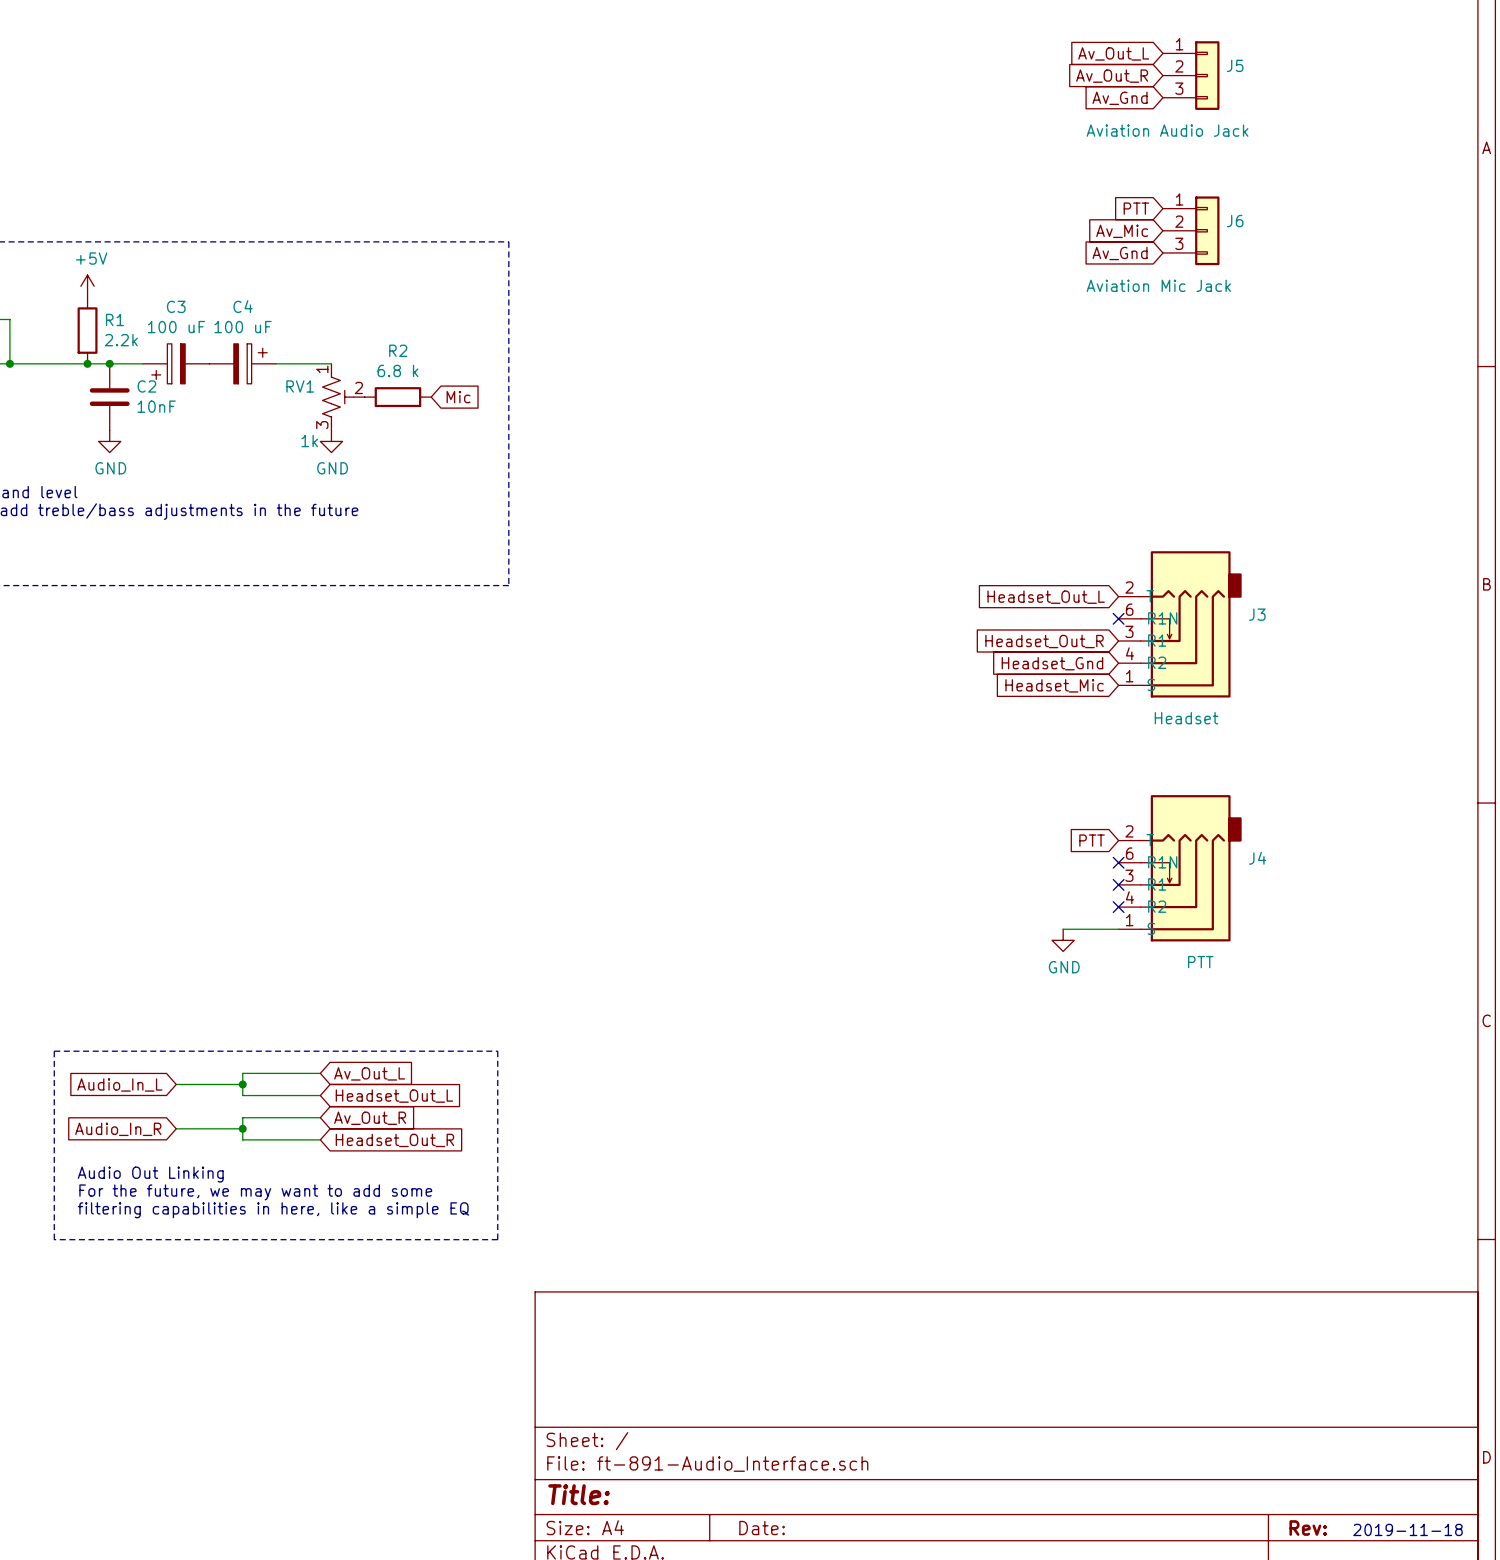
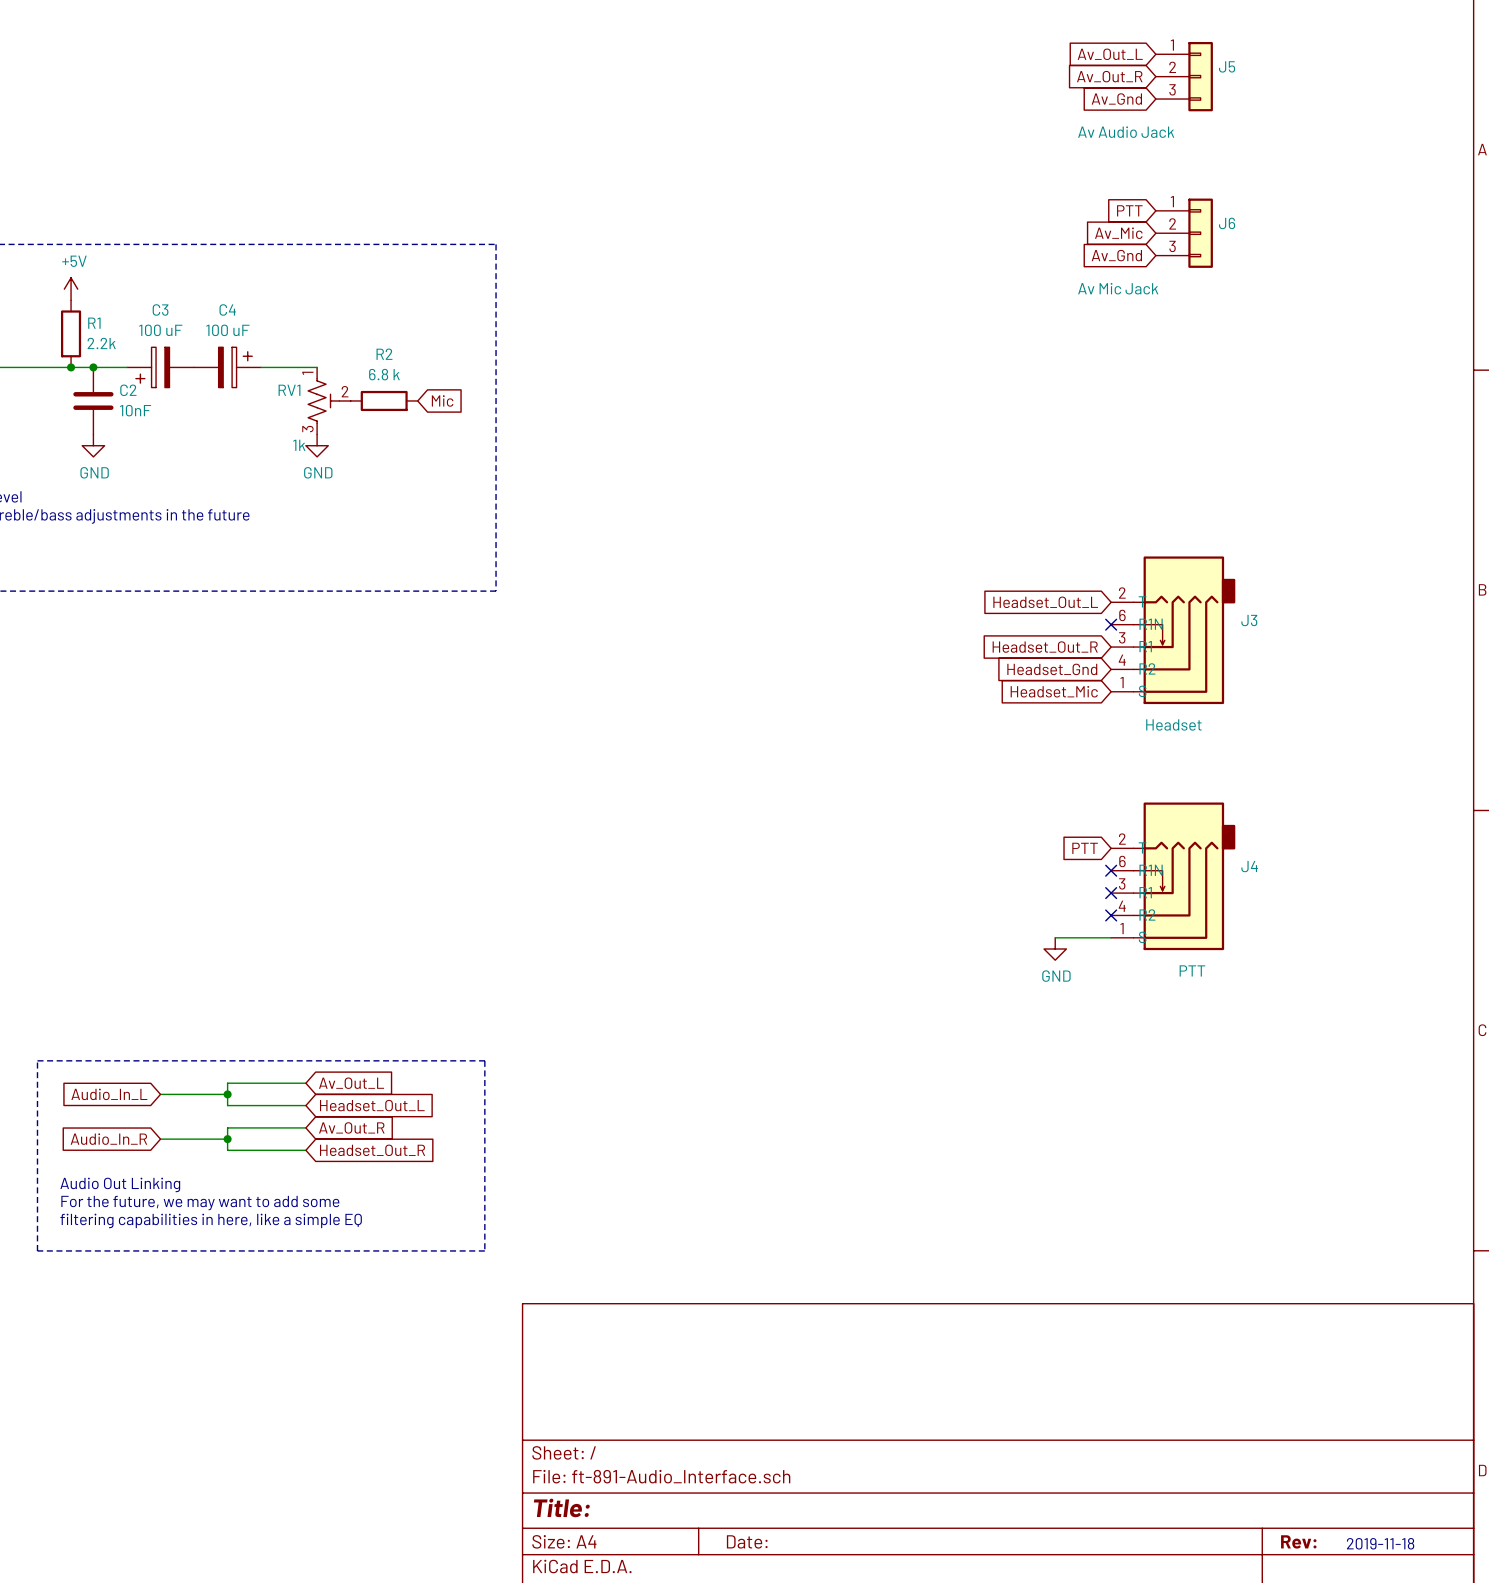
J5 value: Aviation Audio Jack (1167, 130) -> Av Audio Jack (1126, 132)
J6 value: Aviation Mic Jack (1158, 285) -> Av Mic Jack (1118, 288)

